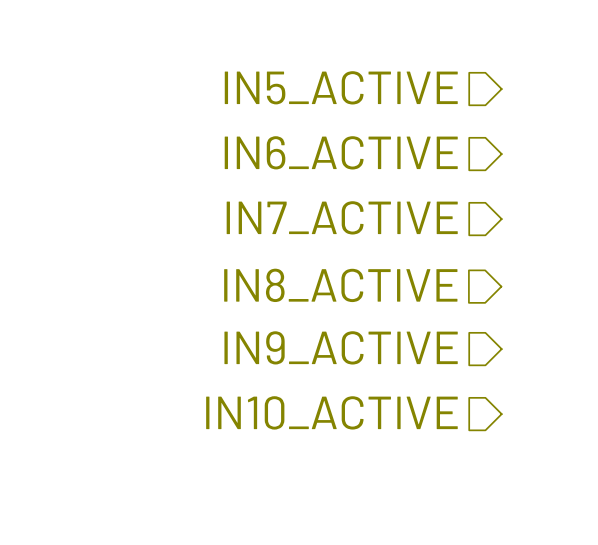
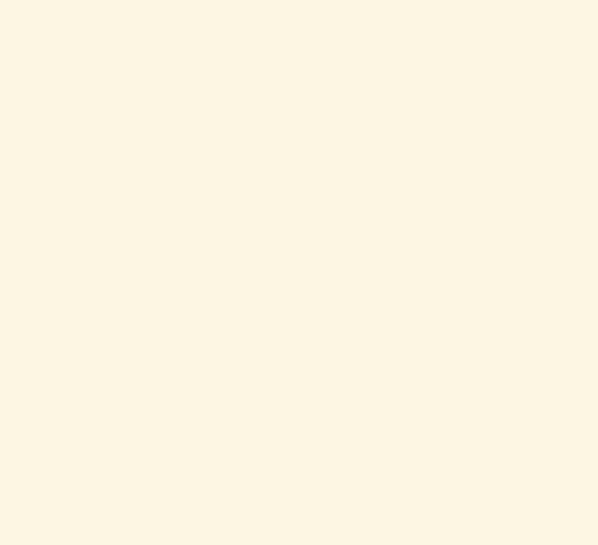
hierarchical label: IN5_ACTIVE (341, 87) -> none
hierarchical label: IN6_ACTIVE (341, 152) -> none
hierarchical label: IN7_ACTIVE (342, 217) -> none
hierarchical label: IN8_ACTIVE (340, 285) -> none
hierarchical label: IN9_ACTIVE (341, 347) -> none
hierarchical label: IN10_ACTIVE (331, 412) -> none

